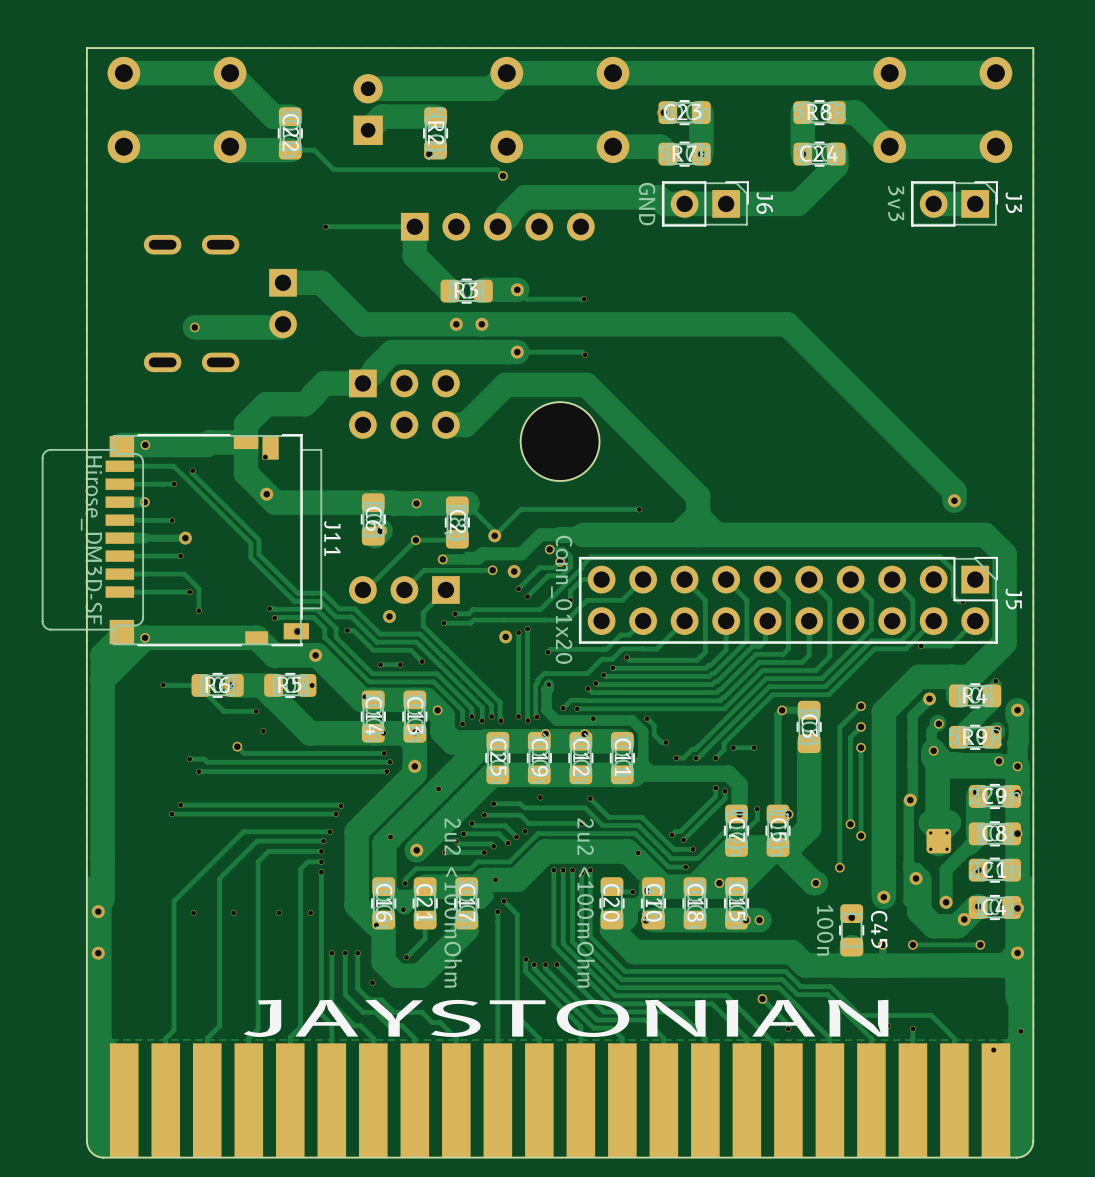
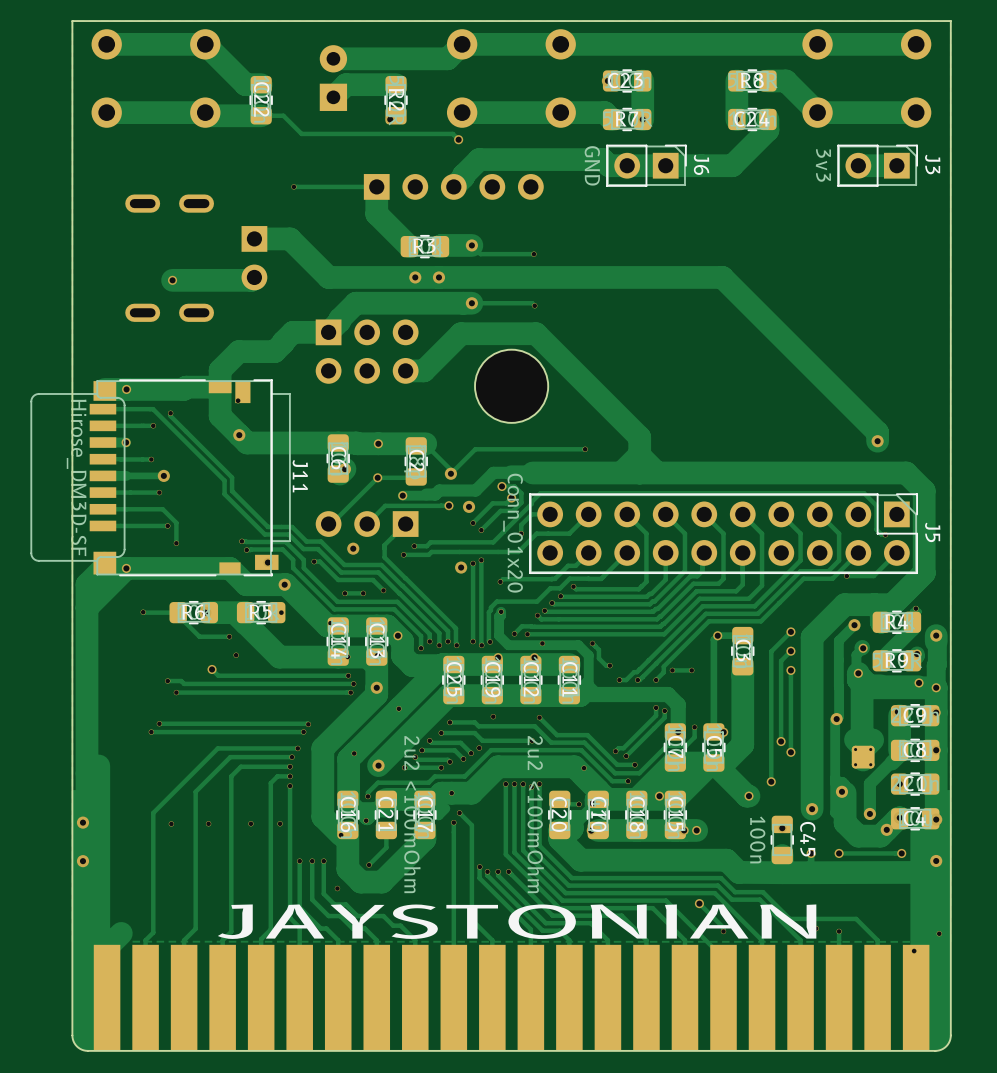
track: none -> (98, 765) (98, 962)
track: none -> (921, 833) (921, 953)
track: none -> (121, 933) (110, 943)

